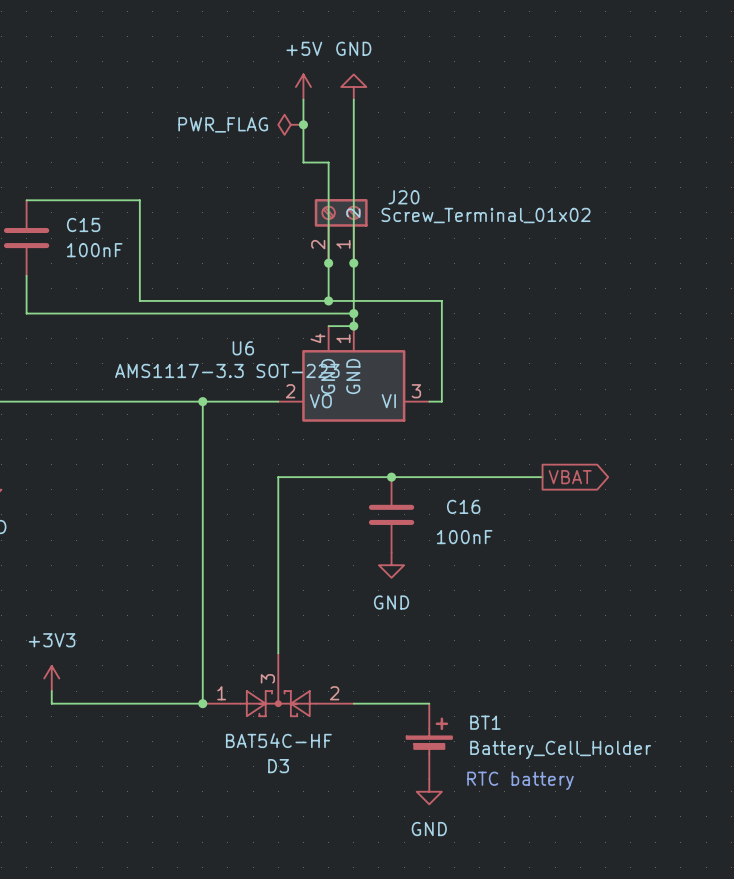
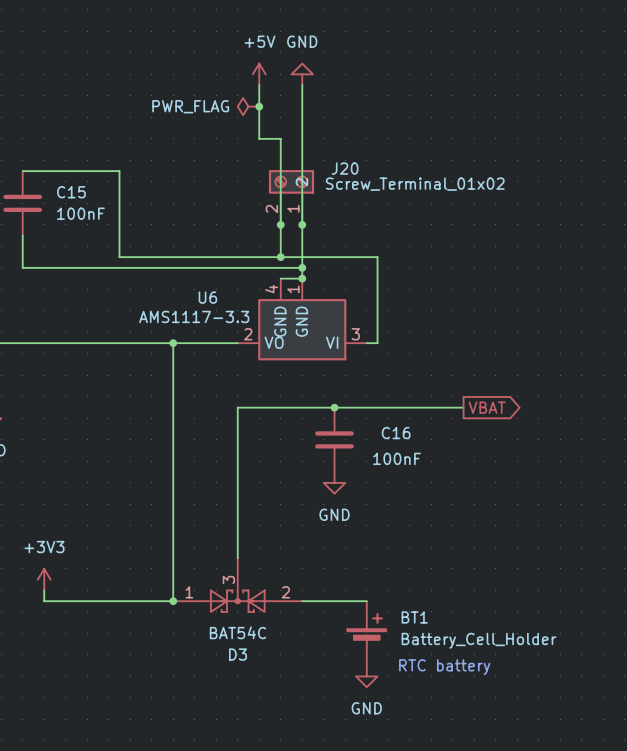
U6 value: AMS1117-3.3 SOT-223 (227, 370) -> AMS1117-3.3 (194, 316)
D3 value: BAT54C-HF (278, 740) -> BAT54C (238, 632)

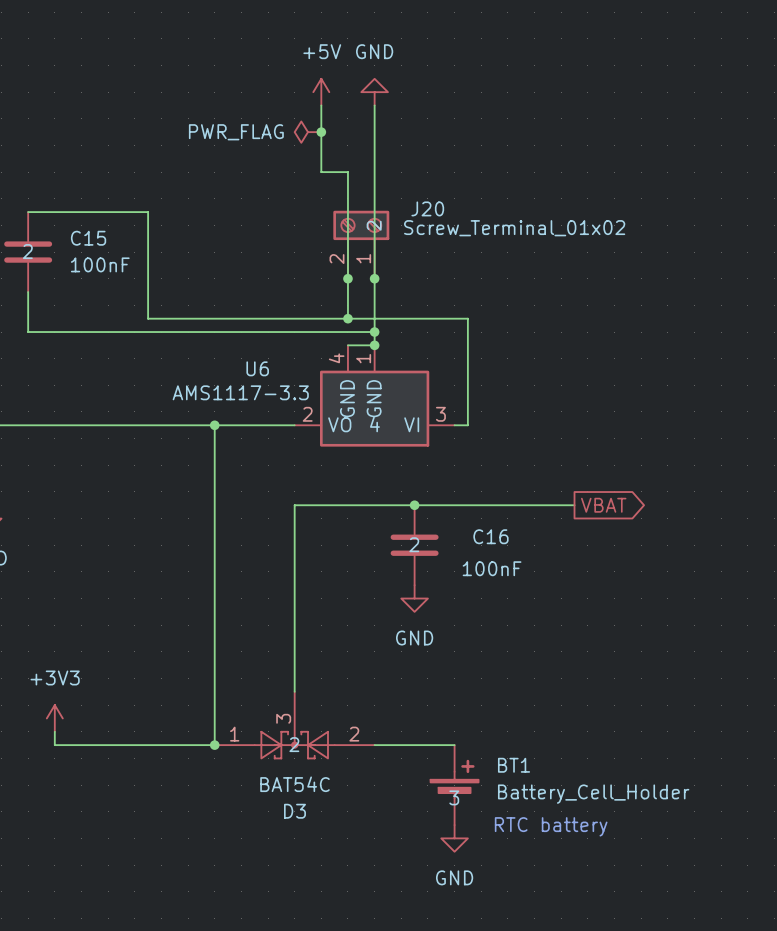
C15 text: none -> 2 (27, 251)
U6 text: none -> 4 (374, 424)
C16 text: none -> 2 (414, 544)
D3 text: none -> 2 (294, 744)
BT1 text: none -> 3 (454, 797)

